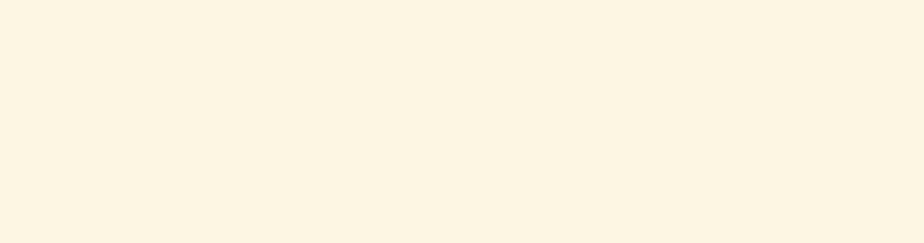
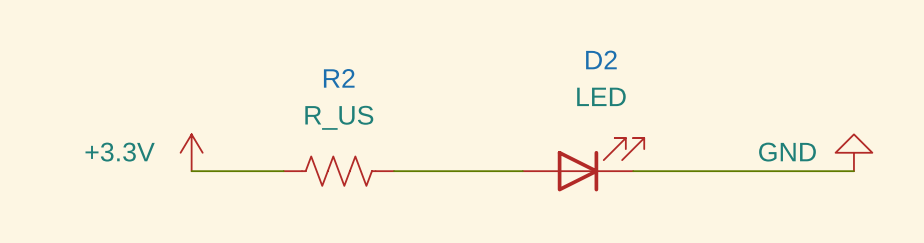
power symbol: none -> +3.3V (191, 152)
power symbol: none -> GND (853, 152)
D2: none -> LED (583, 164)
wire: none -> (191, 171) (283, 171)
R2: none -> R_US (338, 171)
wire: none -> (394, 171) (522, 171)
wire: none -> (633, 171) (853, 171)

